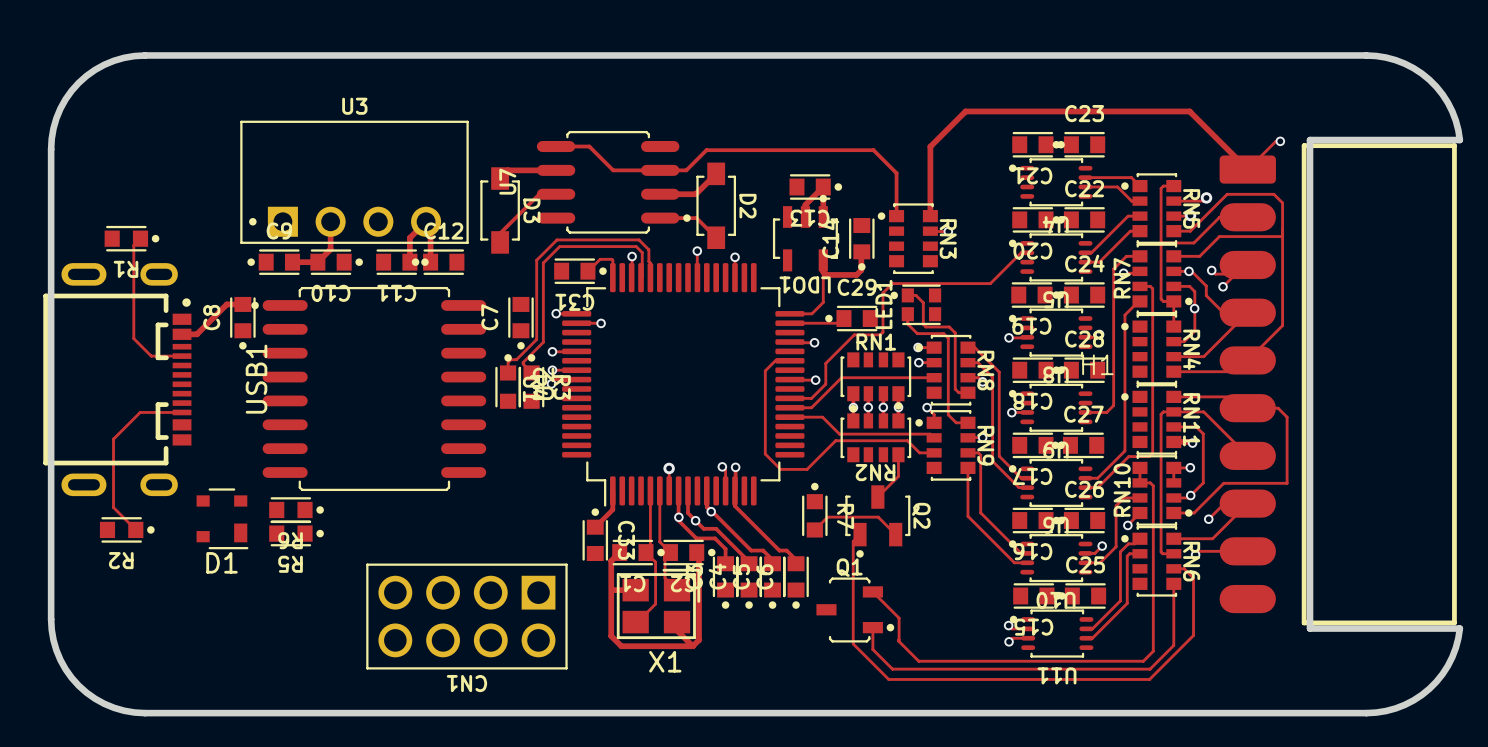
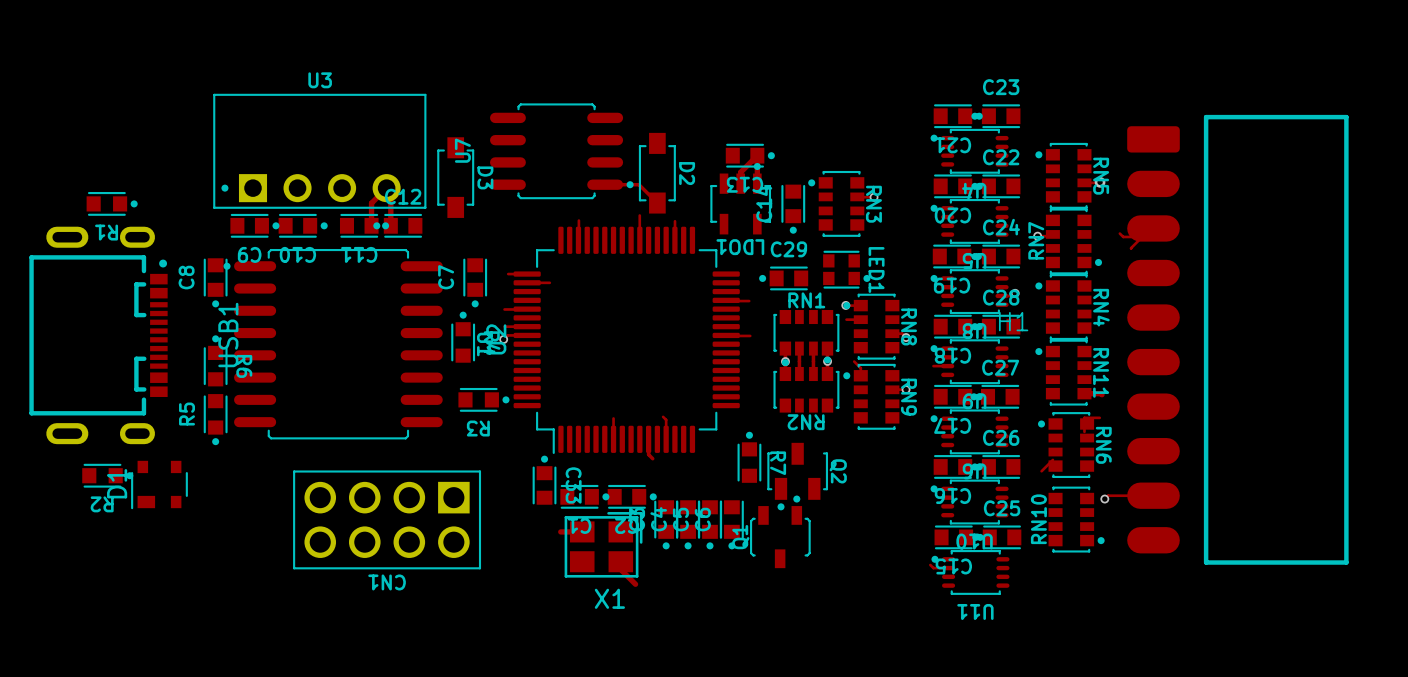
board edge: (145, 55) (1366, 55) (1385, 57) (1404, 63) (1421, 73) (1442, 94) (1452, 111) (1459, 140) (1310, 140) (1310, 628) (1459, 628) (1452, 657) (1436, 681) (1413, 700) (1386, 711) (1366, 713) (145, 713) (124, 710) (104, 703) (86, 692) (65, 669) (56, 650) (51, 629) (51, 138) (60, 108) (78, 82) (104, 64) (124, 57) (145, 55) -> none
track: (1280, 141) (1275, 141) (1247, 169) (1189, 111) (965, 111) (930, 146) (930, 216) -> none
via: (1280, 141) -> none
track: (556, 146) (589, 146) (613, 170) (686, 170) (706, 150) (873, 150) (896, 173) (896, 216) -> none
track: (556, 170) (508, 170) (500, 178) -> none
track: (716, 173) (695, 194) (660, 194) -> none
track: (1085, 177) (1131, 177) (1139, 186) -> none
track: (1173, 186) (1163, 186) (1161, 188) (1161, 299) (1163, 301) (1173, 301) (1173, 326) -> none
track: (1085, 187) (1117, 187) (1131, 201) (1139, 201) -> none
track: (556, 194) (539, 194) (500, 233) (500, 242) -> none
track: (1206, 197) (1203, 201) (1173, 201) -> none
via: (1206, 197) -> none
track: (1139, 216) (1128, 216) (1091, 252) (1085, 252) -> none
track: (1247, 217) (1219, 217) (1193, 243) (1161, 243) -> none
track: (330, 221) (330, 249) (317, 262) (292, 262) -> none
track: (1139, 231) (1130, 231) (1099, 262) (1085, 262) -> none
track: (1173, 231) (1190, 231) (1227, 194) (1273, 194) (1282, 202) (1282, 325) (1236, 371) (1173, 371) -> none
track: (1282, 236) (1219, 236) (1199, 256) (1173, 256) -> none
track: (140, 238) (133, 245) (133, 338) (151, 356) (182, 356) -> none
via: (697, 251) -> none
track: (861, 251) (861, 270) (856, 274) (826, 274) (823, 272) (823, 260) (823, 302) (811, 313) (789, 313) -> none
track: (1027, 252) (1021, 252) (990, 283) (892, 283) (882, 293) (882, 332) (880, 334) (854, 334) (825, 363) (825, 384) (811, 398) (789, 398) -> none
via: (632, 256) -> none
track: (1139, 256) (1126, 256) (1113, 269) (1113, 405) (1106, 412) (1085, 412) -> none
via: (735, 257) -> none
C9 rotation: 0° (273, 262) -> 180° (254, 225)
via: (1211, 270) -> none
C31: (580, 271) -> none
track: (588, 271) (600, 259) (611, 259) (612, 277) -> none
track: (1173, 271) (1191, 271) (1206, 286) (1206, 295) (1223, 312) (1247, 312) (1203, 356) (1173, 356) -> none
via: (1189, 271) -> none
track: (641, 277) (642, 252) (636, 246) (559, 246) (543, 262) (543, 342) (523, 362) (531, 372) -> none
track: (650, 277) (648, 249) (638, 239) (557, 239) (536, 260) (536, 339) (516, 359) (510, 359) (508, 362) (508, 372) -> none
track: (1139, 286) (1150, 286) (1152, 288) (1152, 453) (1149, 456) (1128, 456) (1097, 487) (1085, 487) -> none
track: (1173, 286) (1189, 286) (1194, 291) (1194, 330) (1184, 341) (1173, 341) -> none
via: (1223, 286) -> none
track: (907, 295) (916, 295) (923, 302) (923, 324) (925, 326) (949, 326) (955, 332) (955, 389) (958, 392) (967, 392) -> none
track: (1139, 301) (1124, 315) (1124, 451) (1097, 478) (1085, 478) -> none
track: (242, 304) (226, 304) (196, 334) (182, 334) -> none
LED1 rotation: 0° (915, 304) -> 180° (846, 269)
via: (1194, 308) -> none
via: (556, 313) -> none
track: (907, 314) (907, 324) (917, 333) (943, 333) (948, 338) (948, 414) (956, 422) (967, 422) -> none
track: (843, 318) (839, 323) (789, 323) -> none
via: (601, 323) -> none
via: (1009, 337) -> none
track: (1027, 337) (1009, 337) -> none
via: (814, 342) -> none
track: (967, 347) (974, 347) (999, 372) (999, 456) (1021, 478) (1027, 478) -> none
via: (552, 351) -> none
track: (789, 360) (775, 360) (765, 370) (765, 454) (780, 469) (807, 469) (835, 440) (907, 440) (919, 452) (934, 452) -> none
via: (918, 362) -> none
track: (967, 362) (977, 362) (992, 377) (992, 461) (1018, 487) (1027, 487) -> none
via: (552, 370) -> none
track: (934, 377) (841, 377) (811, 407) (789, 407) -> none
via: (815, 380) -> none
R3 rotation: 0° (531, 381) -> 90° clockwise (483, 399)
R3 position: (531, 381) -> (483, 399)
track: (1173, 396) (1236, 396) (1247, 408) (1278, 408) (1287, 417) (1287, 483) (1223, 483) (1194, 513) (1173, 513) -> none
via: (868, 407) -> none
via: (883, 407) -> none
via: (927, 407) -> none
track: (182, 412) (140, 412) (113, 439) (113, 507) (135, 529) -> none
via: (1011, 412) -> none
track: (789, 417) (822, 417) (839, 434) (930, 434) (934, 437) -> none
track: (1173, 426) (1196, 426) (1203, 433) (1203, 482) (1188, 497) (1173, 497) -> none
via: (1192, 443) -> none
track: (967, 452) (978, 452) (980, 455) (980, 512) (1021, 553) (1027, 553) -> none
track: (898, 454) (898, 476) (877, 497) -> none
track: (1247, 455) (1203, 411) (1163, 411) (1161, 414) (1161, 552) (1173, 553) -> none
via: (722, 466) -> none
track: (735, 467) (734, 506) (779, 550) (786, 550) (796, 559) (796, 563) -> none
via: (735, 467) -> none
track: (967, 467) (967, 516) (1014, 562) (1027, 562) -> none
track: (1139, 467) (1139, 482) (1150, 482) (1153, 485) (1153, 651) (1143, 661) (918, 661) (898, 640) (899, 618) (872, 591) -> none
via: (1190, 467) -> none
via: (669, 468) -> none
track: (612, 490) (612, 509) (595, 527) -> none
track: (650, 490) (650, 548) (646, 552) (655, 562) (655, 604) (635, 622) -> none
track: (659, 490) (659, 541) (670, 552) (664, 558) (664, 578) (677, 590) -> none
track: (678, 490) (678, 520) (696, 538) (715, 538) (725, 548) (725, 563) -> none
track: (688, 490) (688, 513) (703, 528) (716, 528) (749, 563) -> none
RN10 position: (1162, 490) -> (1076, 519)
via: (1190, 495) -> none
track: (1139, 497) (1124, 497) (1116, 505) (1116, 546) (1100, 562) (1085, 562) -> none
track: (706, 506) (751, 550) (763, 550) (772, 559) (772, 563) -> none
R6 rotation: 0° (296, 509) -> 90° counterclockwise (215, 360)
R6 position: (296, 509) -> (215, 360)
via: (711, 511) -> none
via: (678, 517) -> none
D1 rotation: 0° (222, 518) -> 90° clockwise (159, 485)
D1 position: (222, 518) -> (159, 485)
track: (1208, 519) (1224, 503) (1247, 503) (1212, 538) (1173, 538) -> none
via: (1208, 519) -> none
via: (695, 520) -> none
Q2 position: (877, 521) -> (797, 476)
via: (1127, 525) -> none
track: (814, 529) (827, 517) (878, 517) (895, 534) -> none
R5 rotation: 0° (296, 533) -> 90° clockwise (215, 419)
R5 position: (296, 533) -> (215, 419)
track: (860, 534) (853, 541) (853, 643) (888, 679) (1149, 679) (1193, 635) (1193, 578) (1184, 568) (1173, 568) -> none
track: (1139, 538) (1134, 543) (1128, 543) (1120, 551) (1120, 600) (1092, 628) (1086, 628) -> none
track: (1102, 546) (1094, 553) (1085, 553) -> none
via: (1102, 546) -> none
track: (619, 552) (611, 561) (611, 636) (621, 646) (692, 646) (698, 640) (698, 554) (696, 552) -> none
track: (1139, 553) (1129, 553) (1127, 556) (1127, 603) (1092, 638) (1086, 638) -> none
RN6 position: (1151, 561) -> (1066, 445)
track: (1173, 583) (1173, 645) (1150, 669) (892, 669) (872, 649) (872, 627) -> none
Q1 rotation: 0° (855, 610) -> 90° counterclockwise (780, 531)
CN1 position: (466, 616) -> (387, 519)
via: (1008, 625) -> none
track: (1028, 638) (1012, 638) (1009, 641) -> none
via: (1009, 641) -> none

